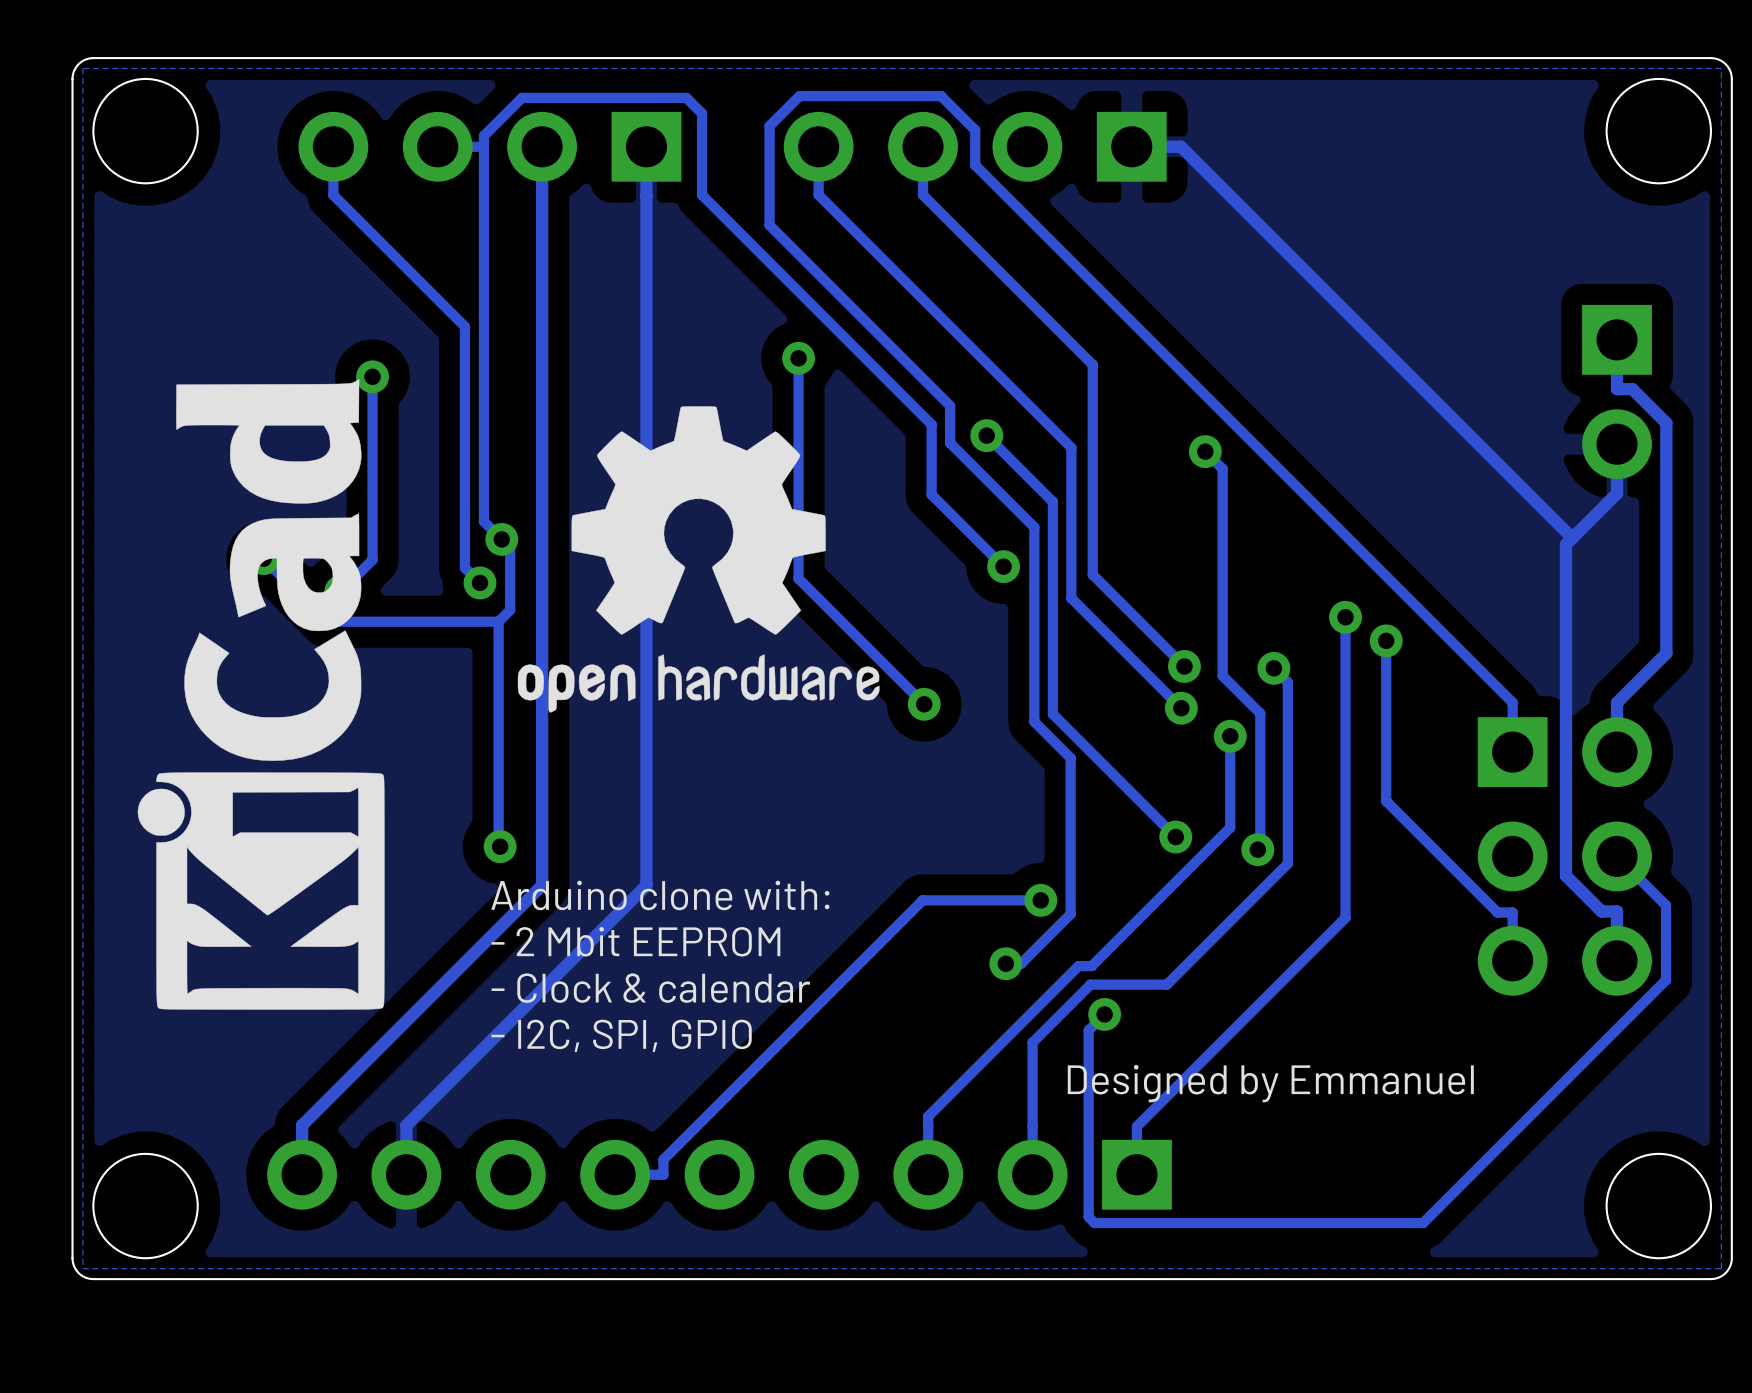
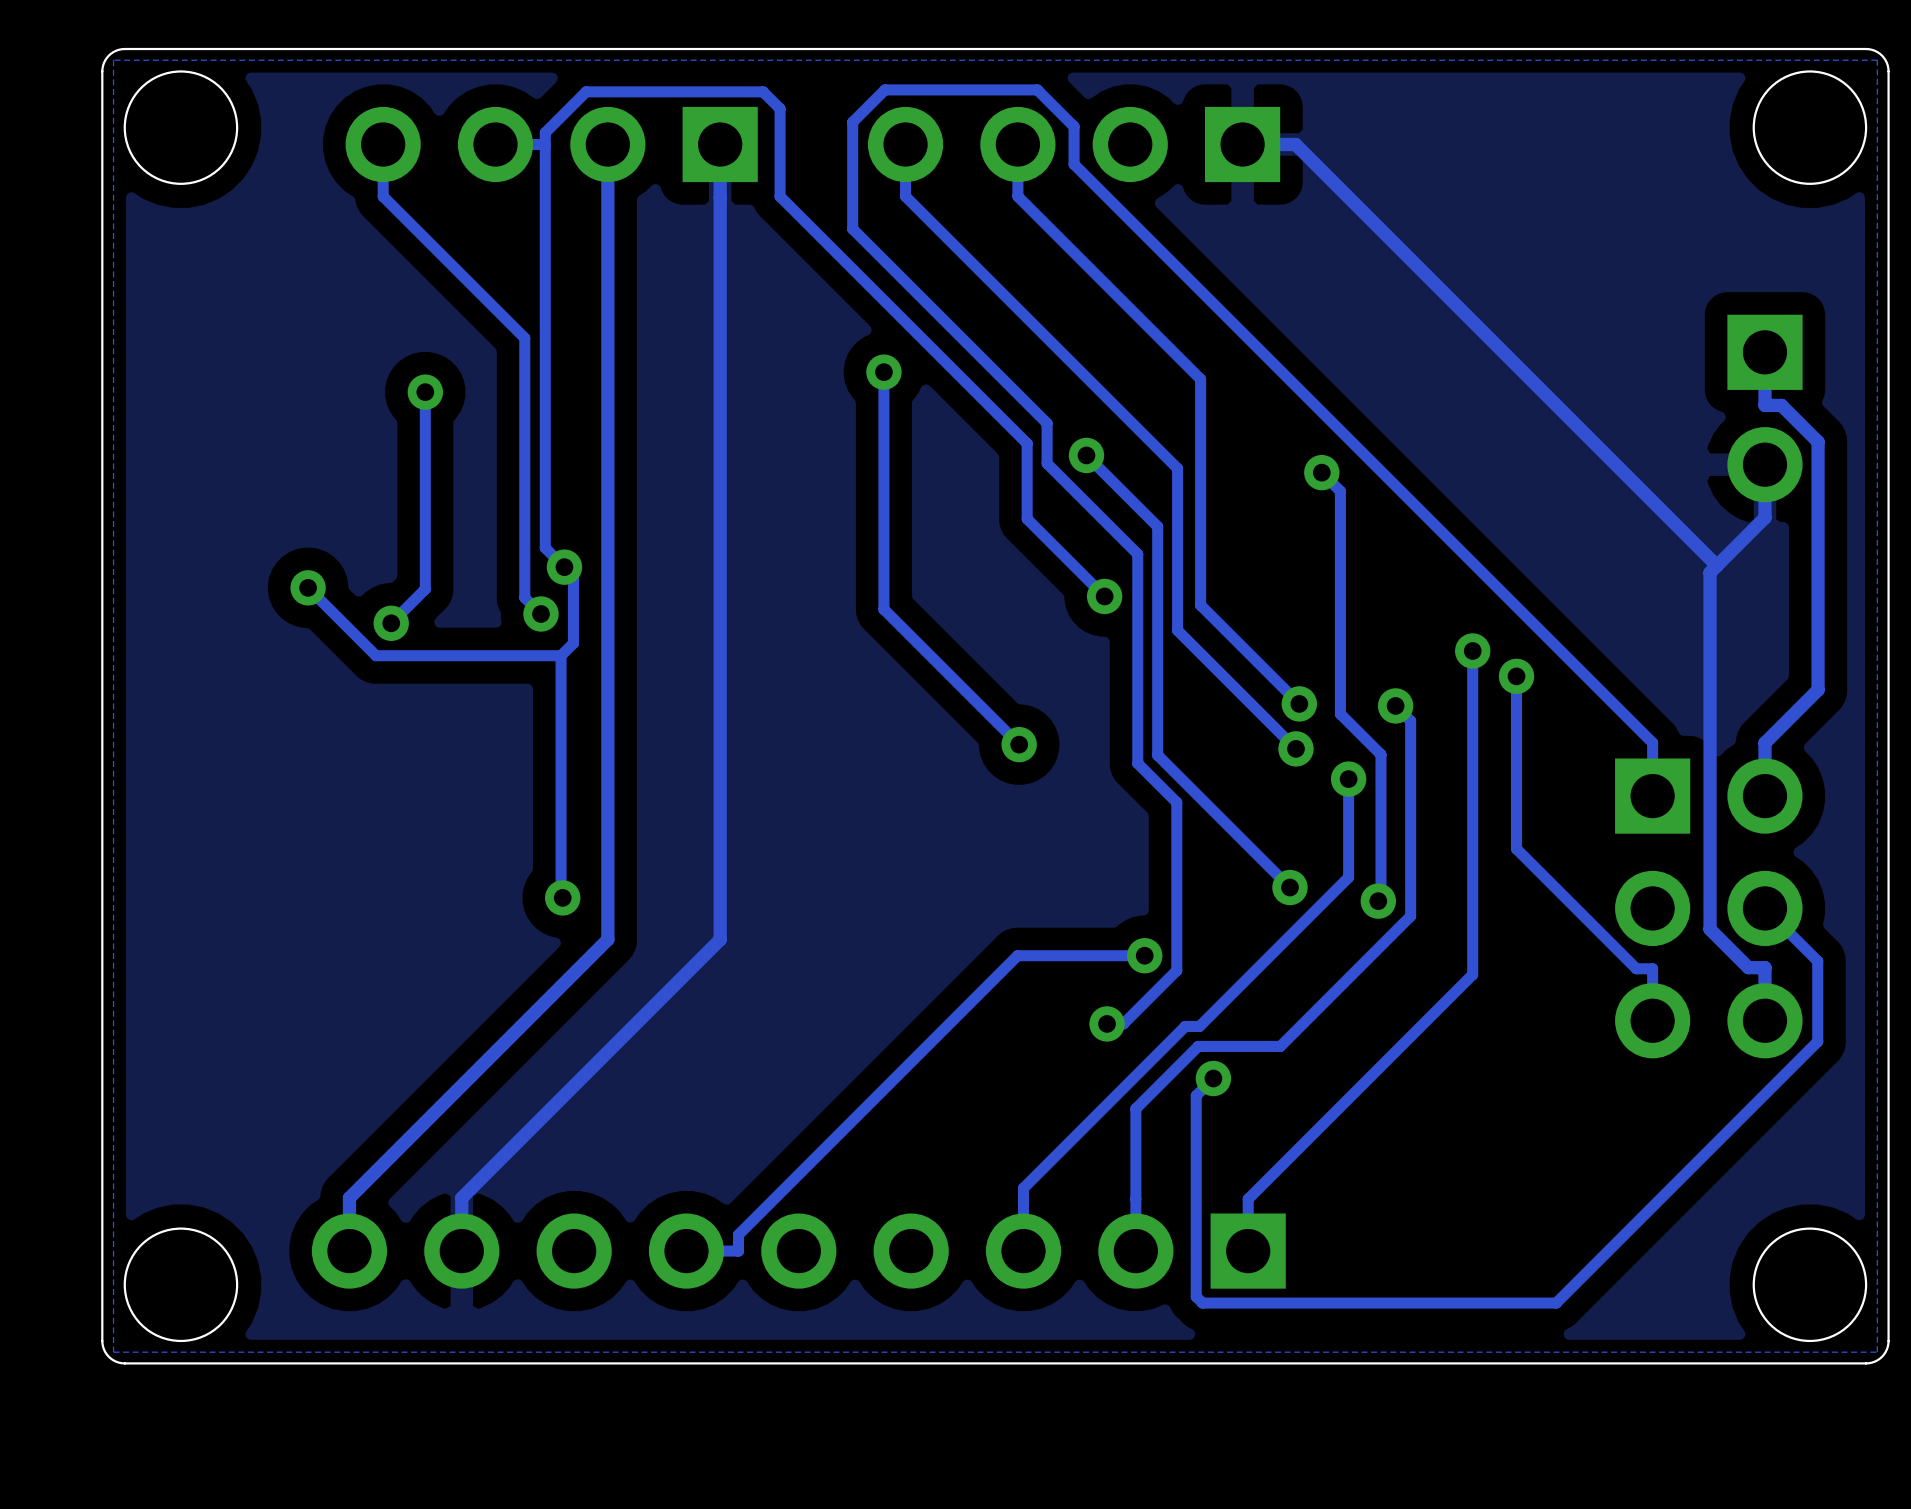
drawing: [137, 379, 385, 1010] -> none
drawing: [517, 406, 880, 713] -> none
text: Arduino clone with: (660, 895) -> none
text: - 2 Mbit EEPROM (635, 941) -> none
text: - Clock & calendar (650, 988) -> none
text: - I2C, SPI, GPIO (621, 1035) -> none
text: Designed by Emmanuel (1270, 1083) -> none

